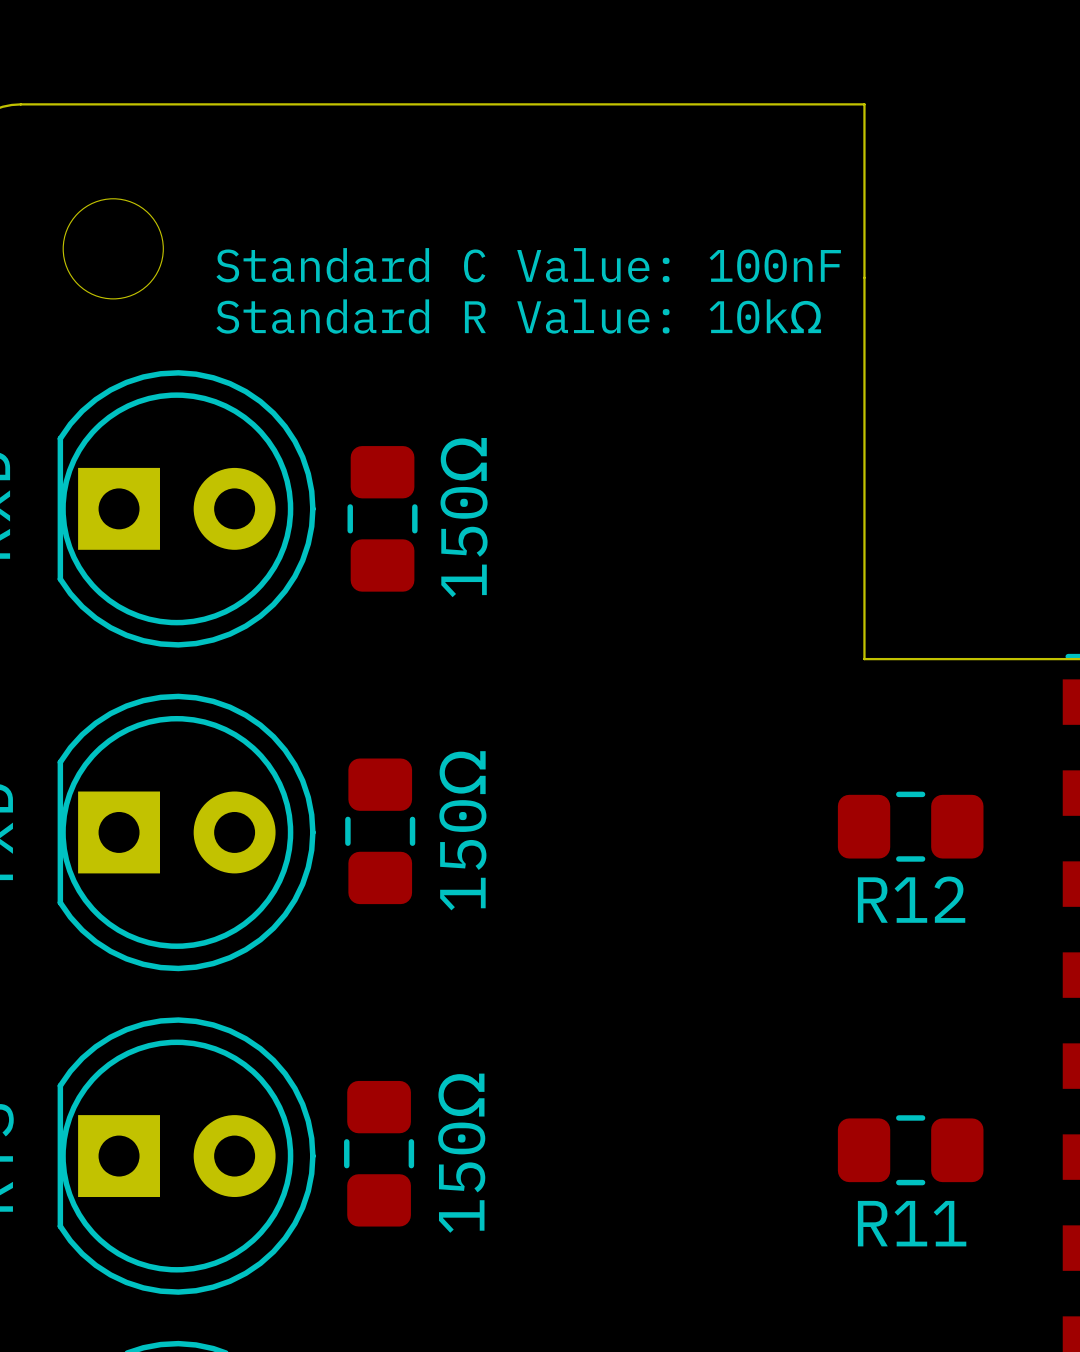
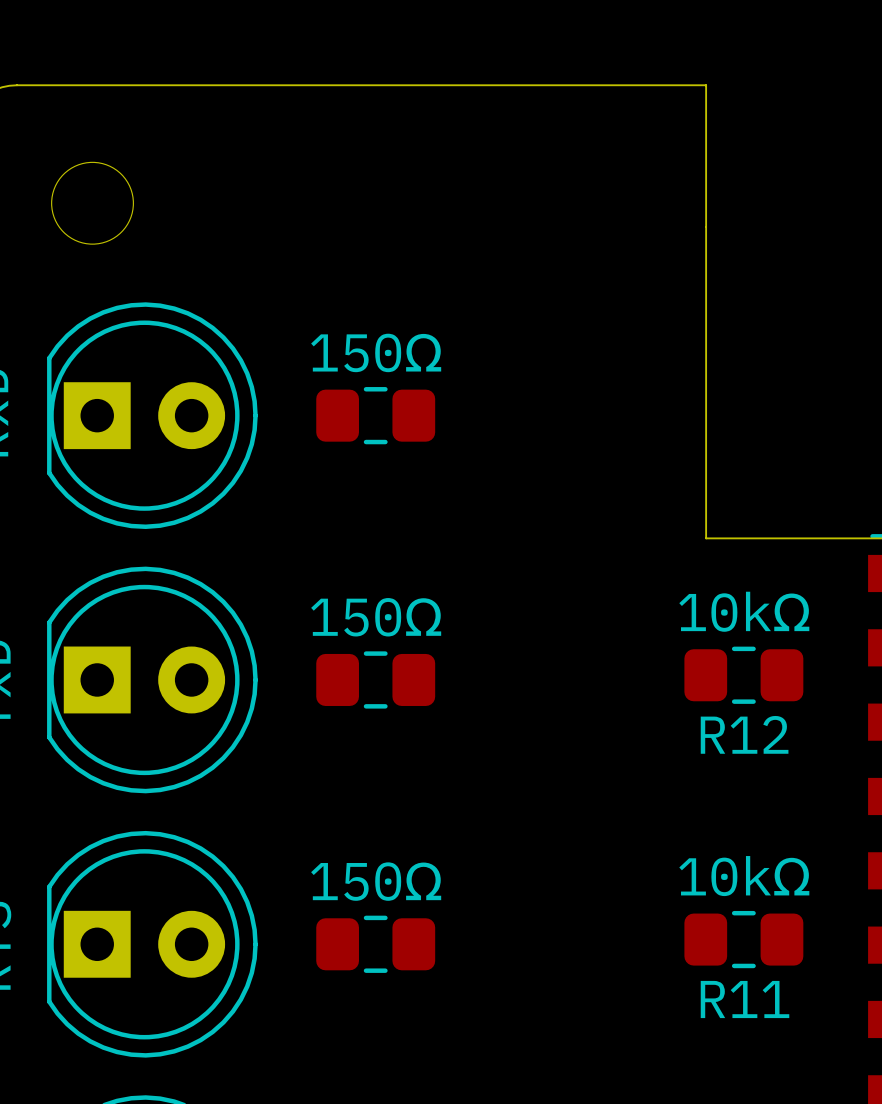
text: Standard C Value: 100nF (528, 265) -> none
text: Standard R Value: 10kΩ (518, 316) -> none
part value position: 150Ω (464, 517) -> 150Ω (376, 352)
part rotation: 0° (382, 518) -> 90° clockwise (375, 415)
R12 value: none -> 10kΩ (744, 611)
part value position: 150Ω (462, 830) -> 150Ω (376, 617)
part rotation: 0° (380, 831) -> 90° clockwise (375, 679)
R11 value: none -> 10kΩ (744, 876)
part rotation: 0° (379, 1153) -> 90° clockwise (375, 944)
part value position: 150Ω (461, 1153) -> 150Ω (376, 881)

